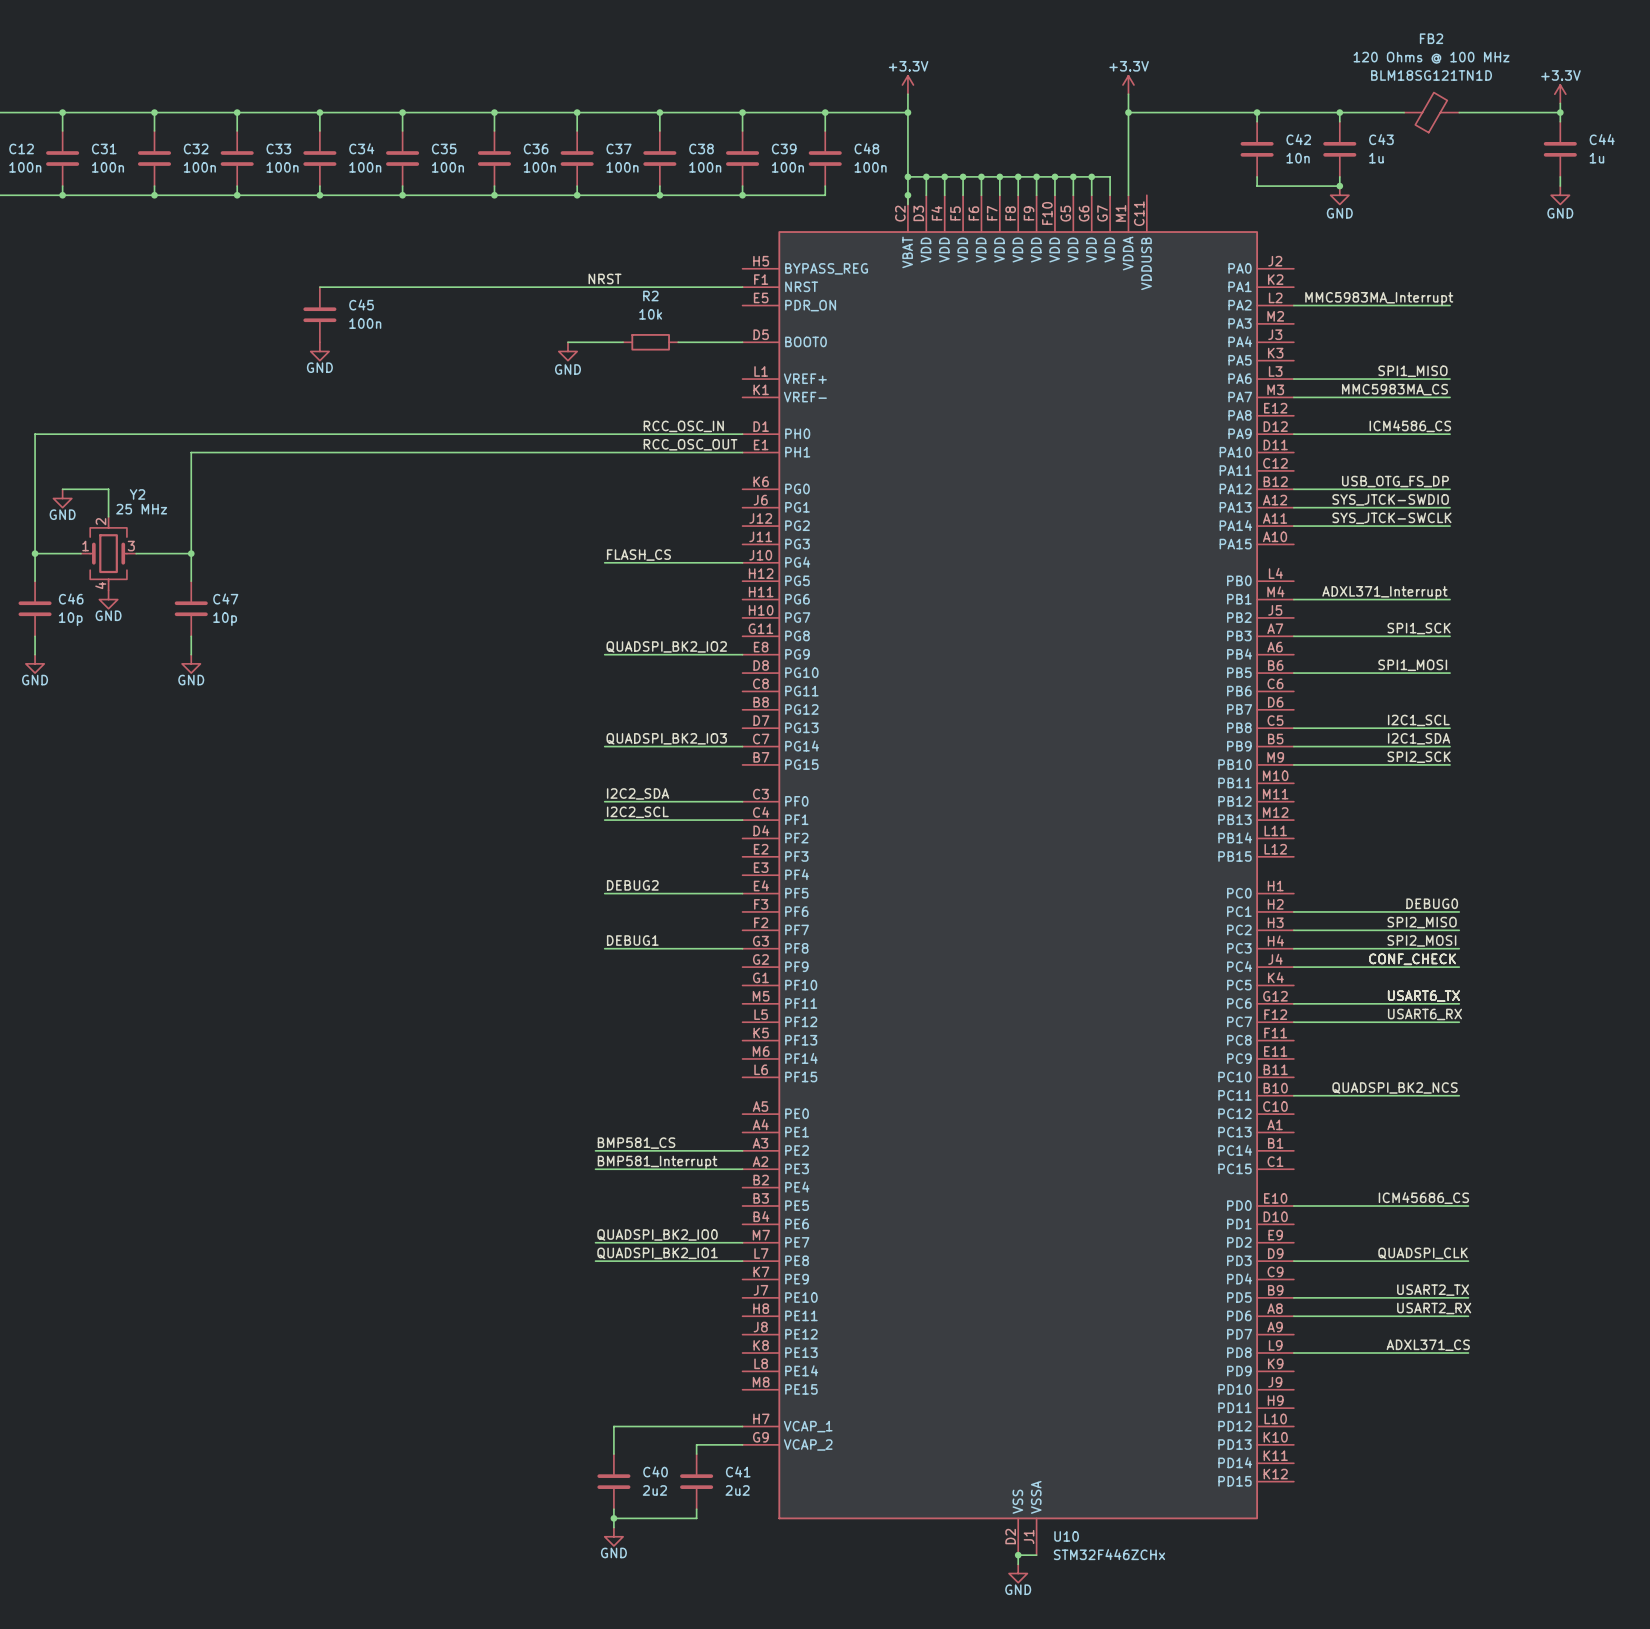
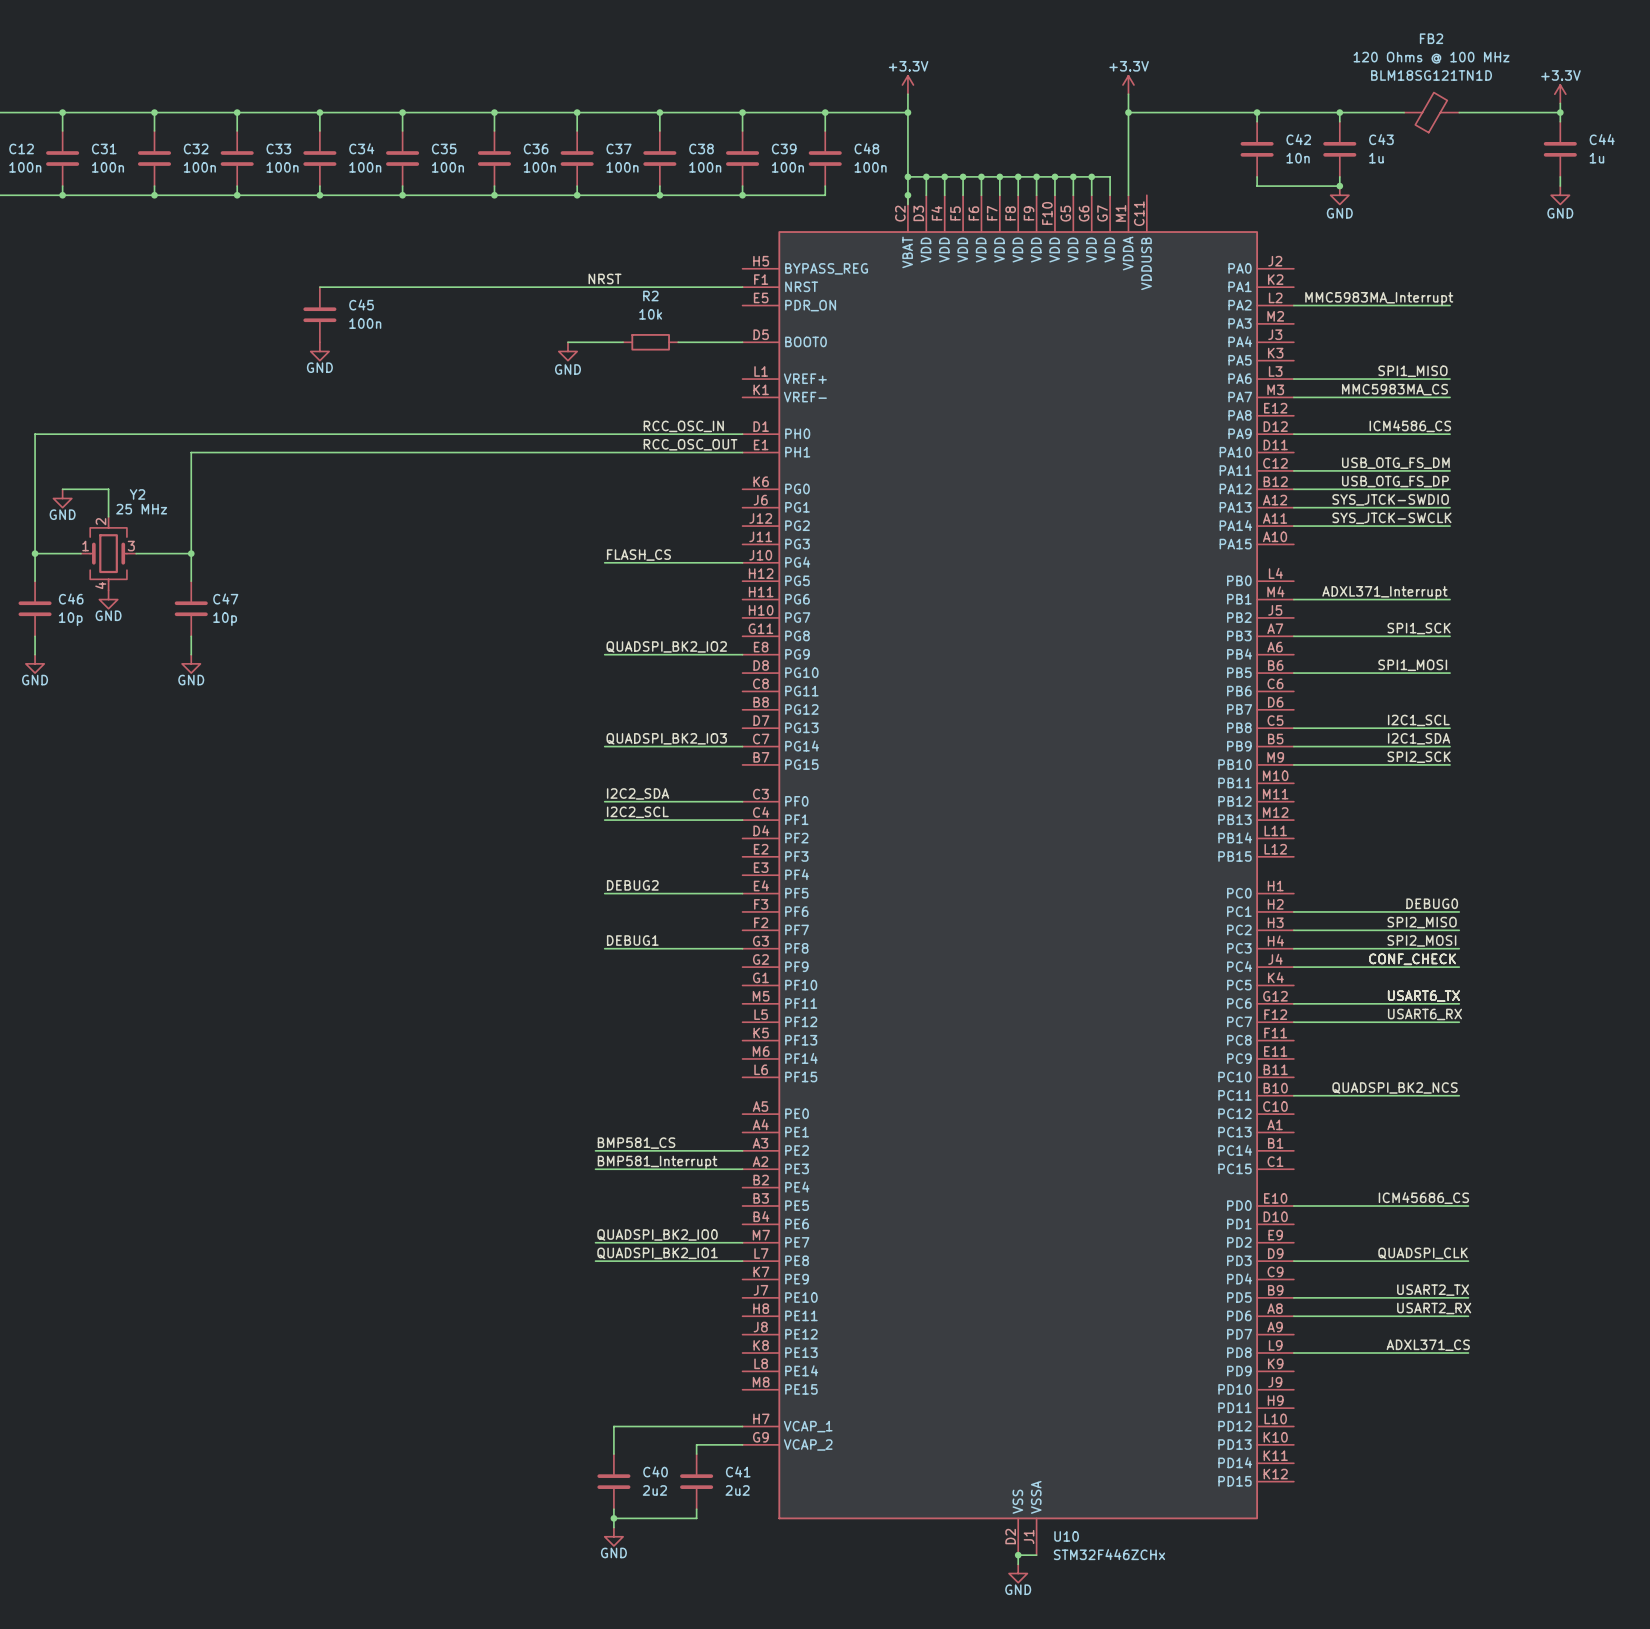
label: none -> USB_OTG_FS_DM (1395, 463)
wire: none -> (1293, 470) (1450, 470)

